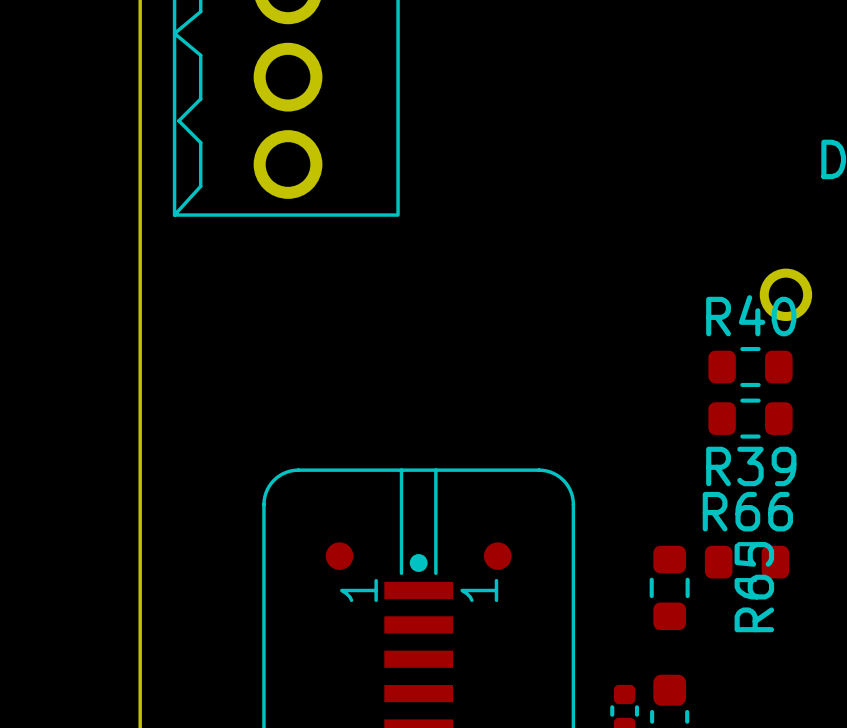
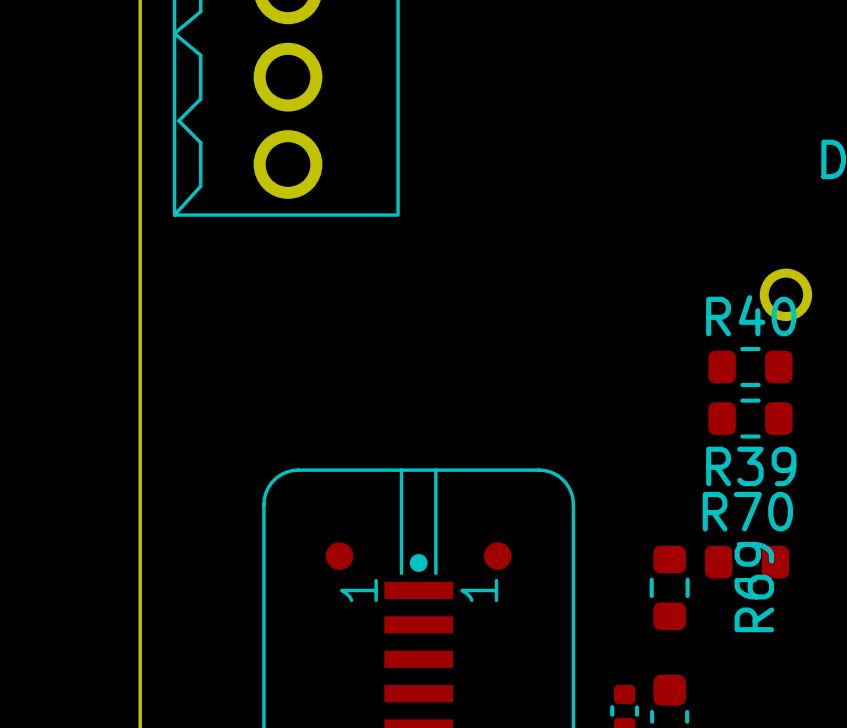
R66 name: R66 (747, 511) -> R70 (747, 511)
R65 name: R65 (754, 587) -> R69 (754, 587)

